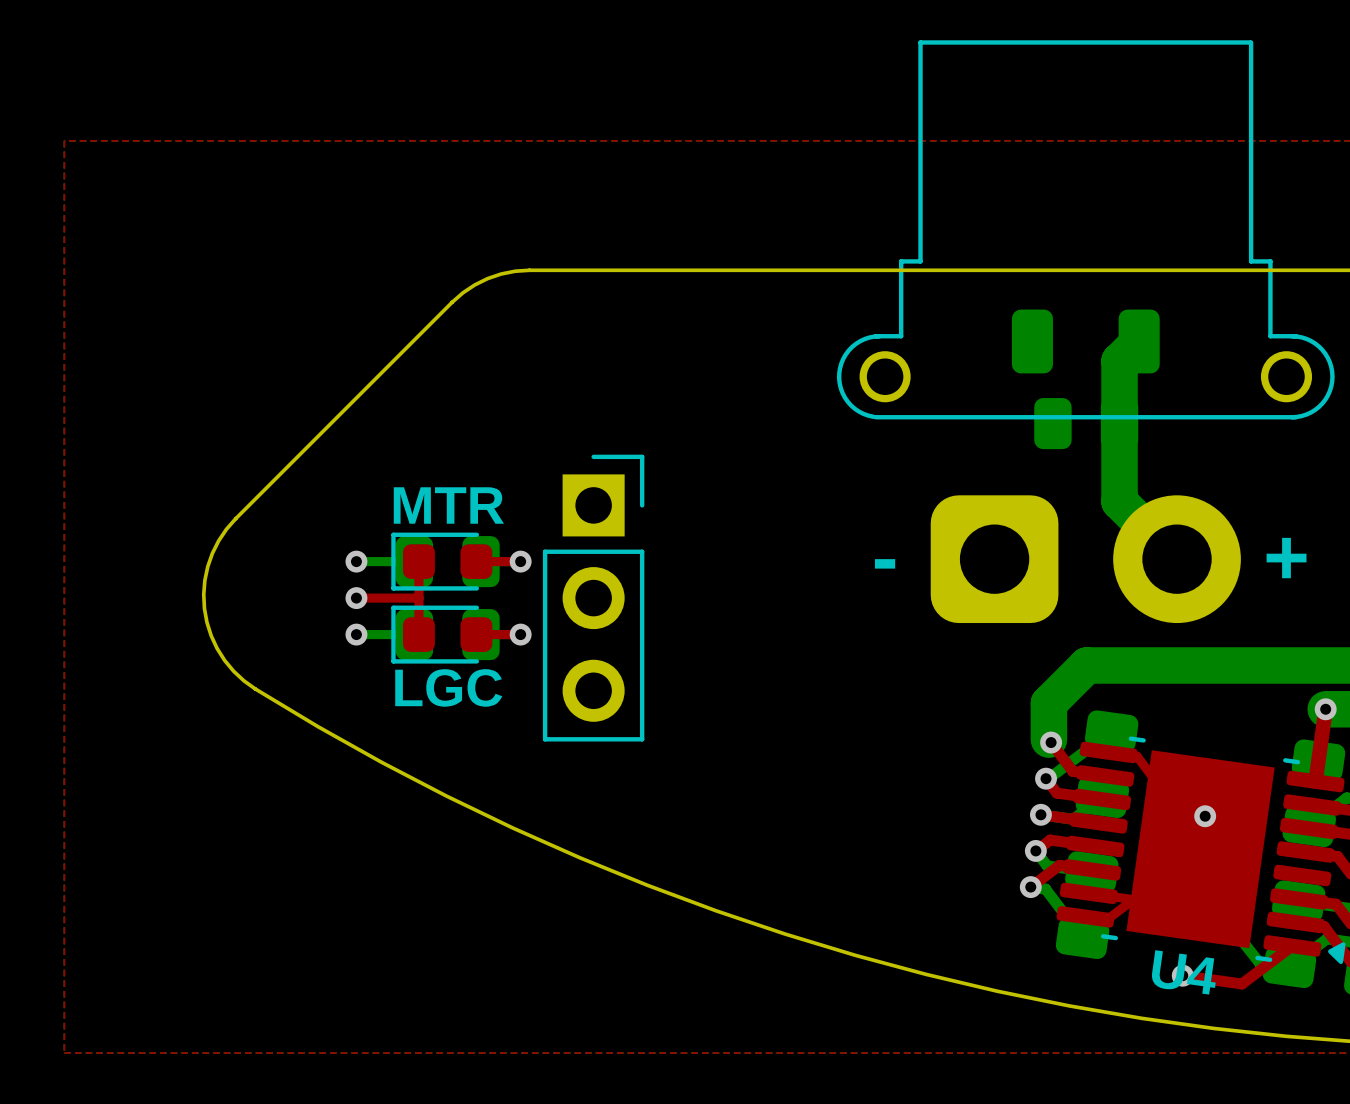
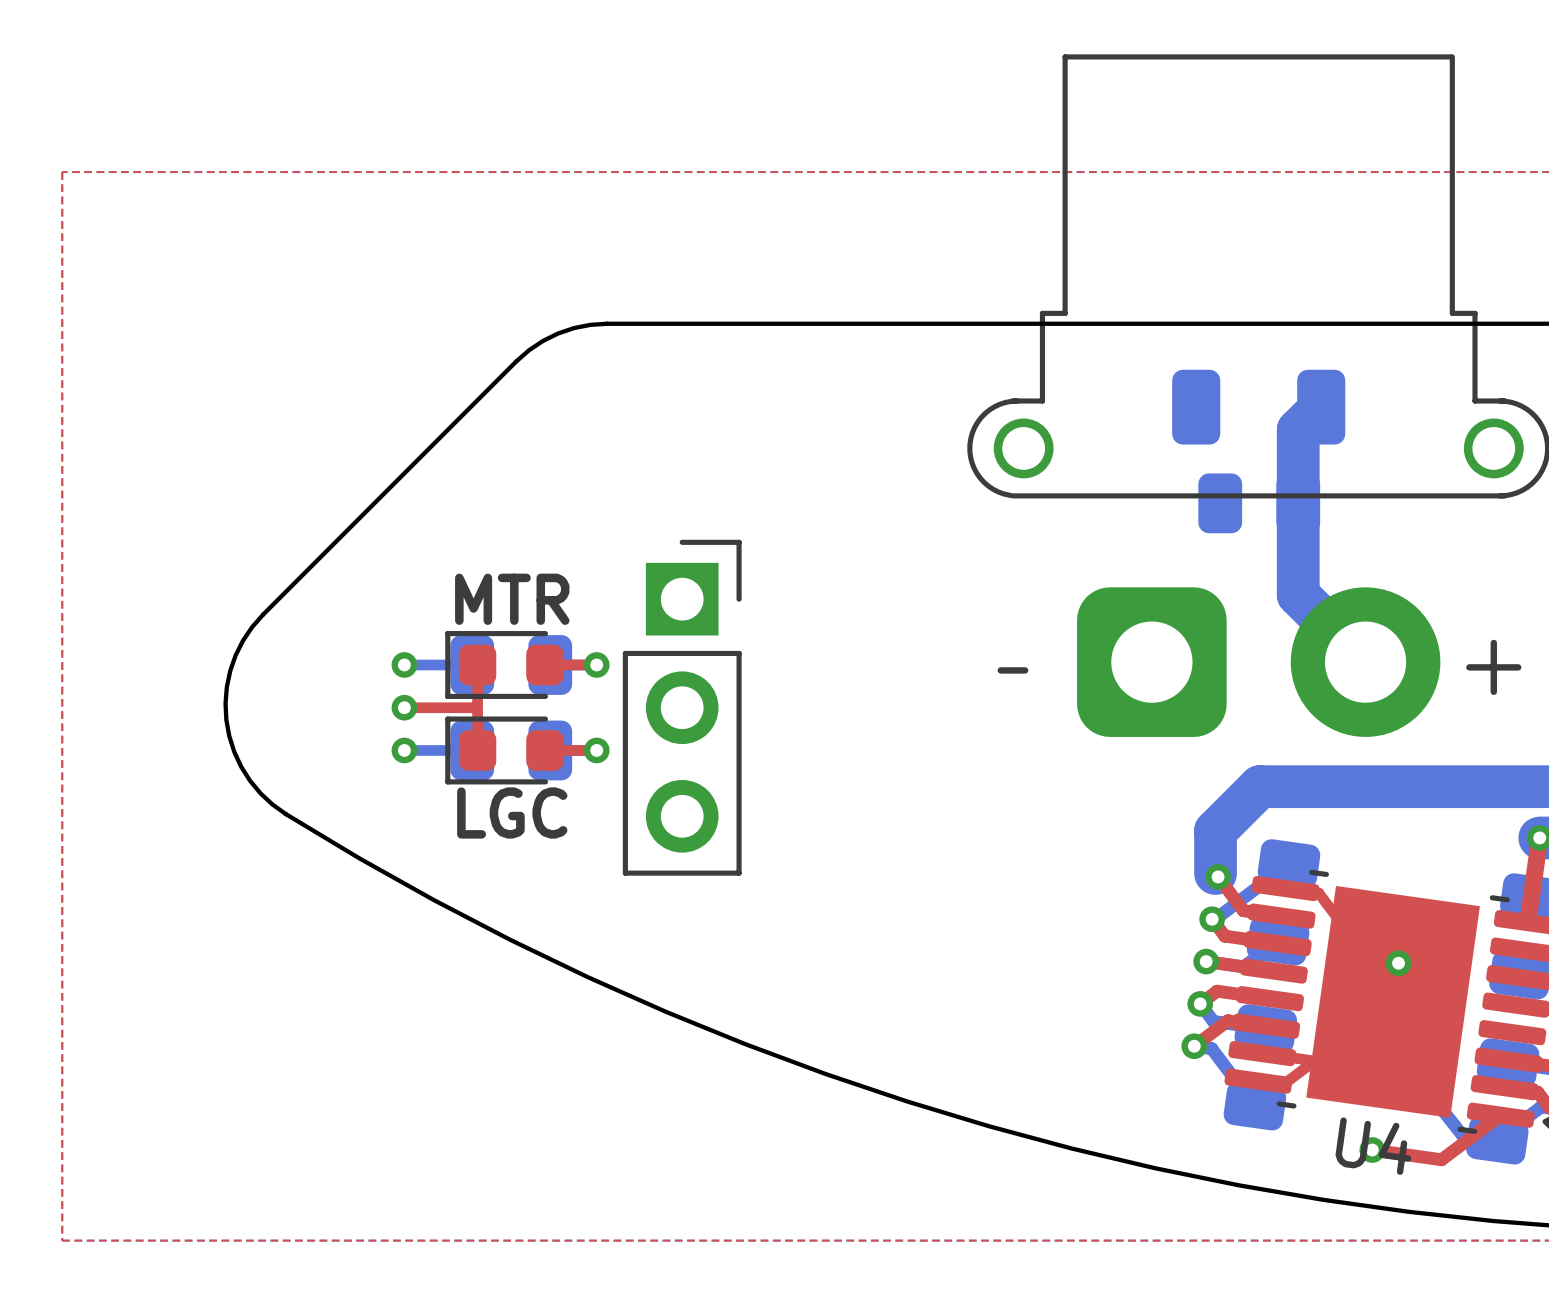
part text: none -> – (1012, 670)
part text: - (885, 563) -> none

